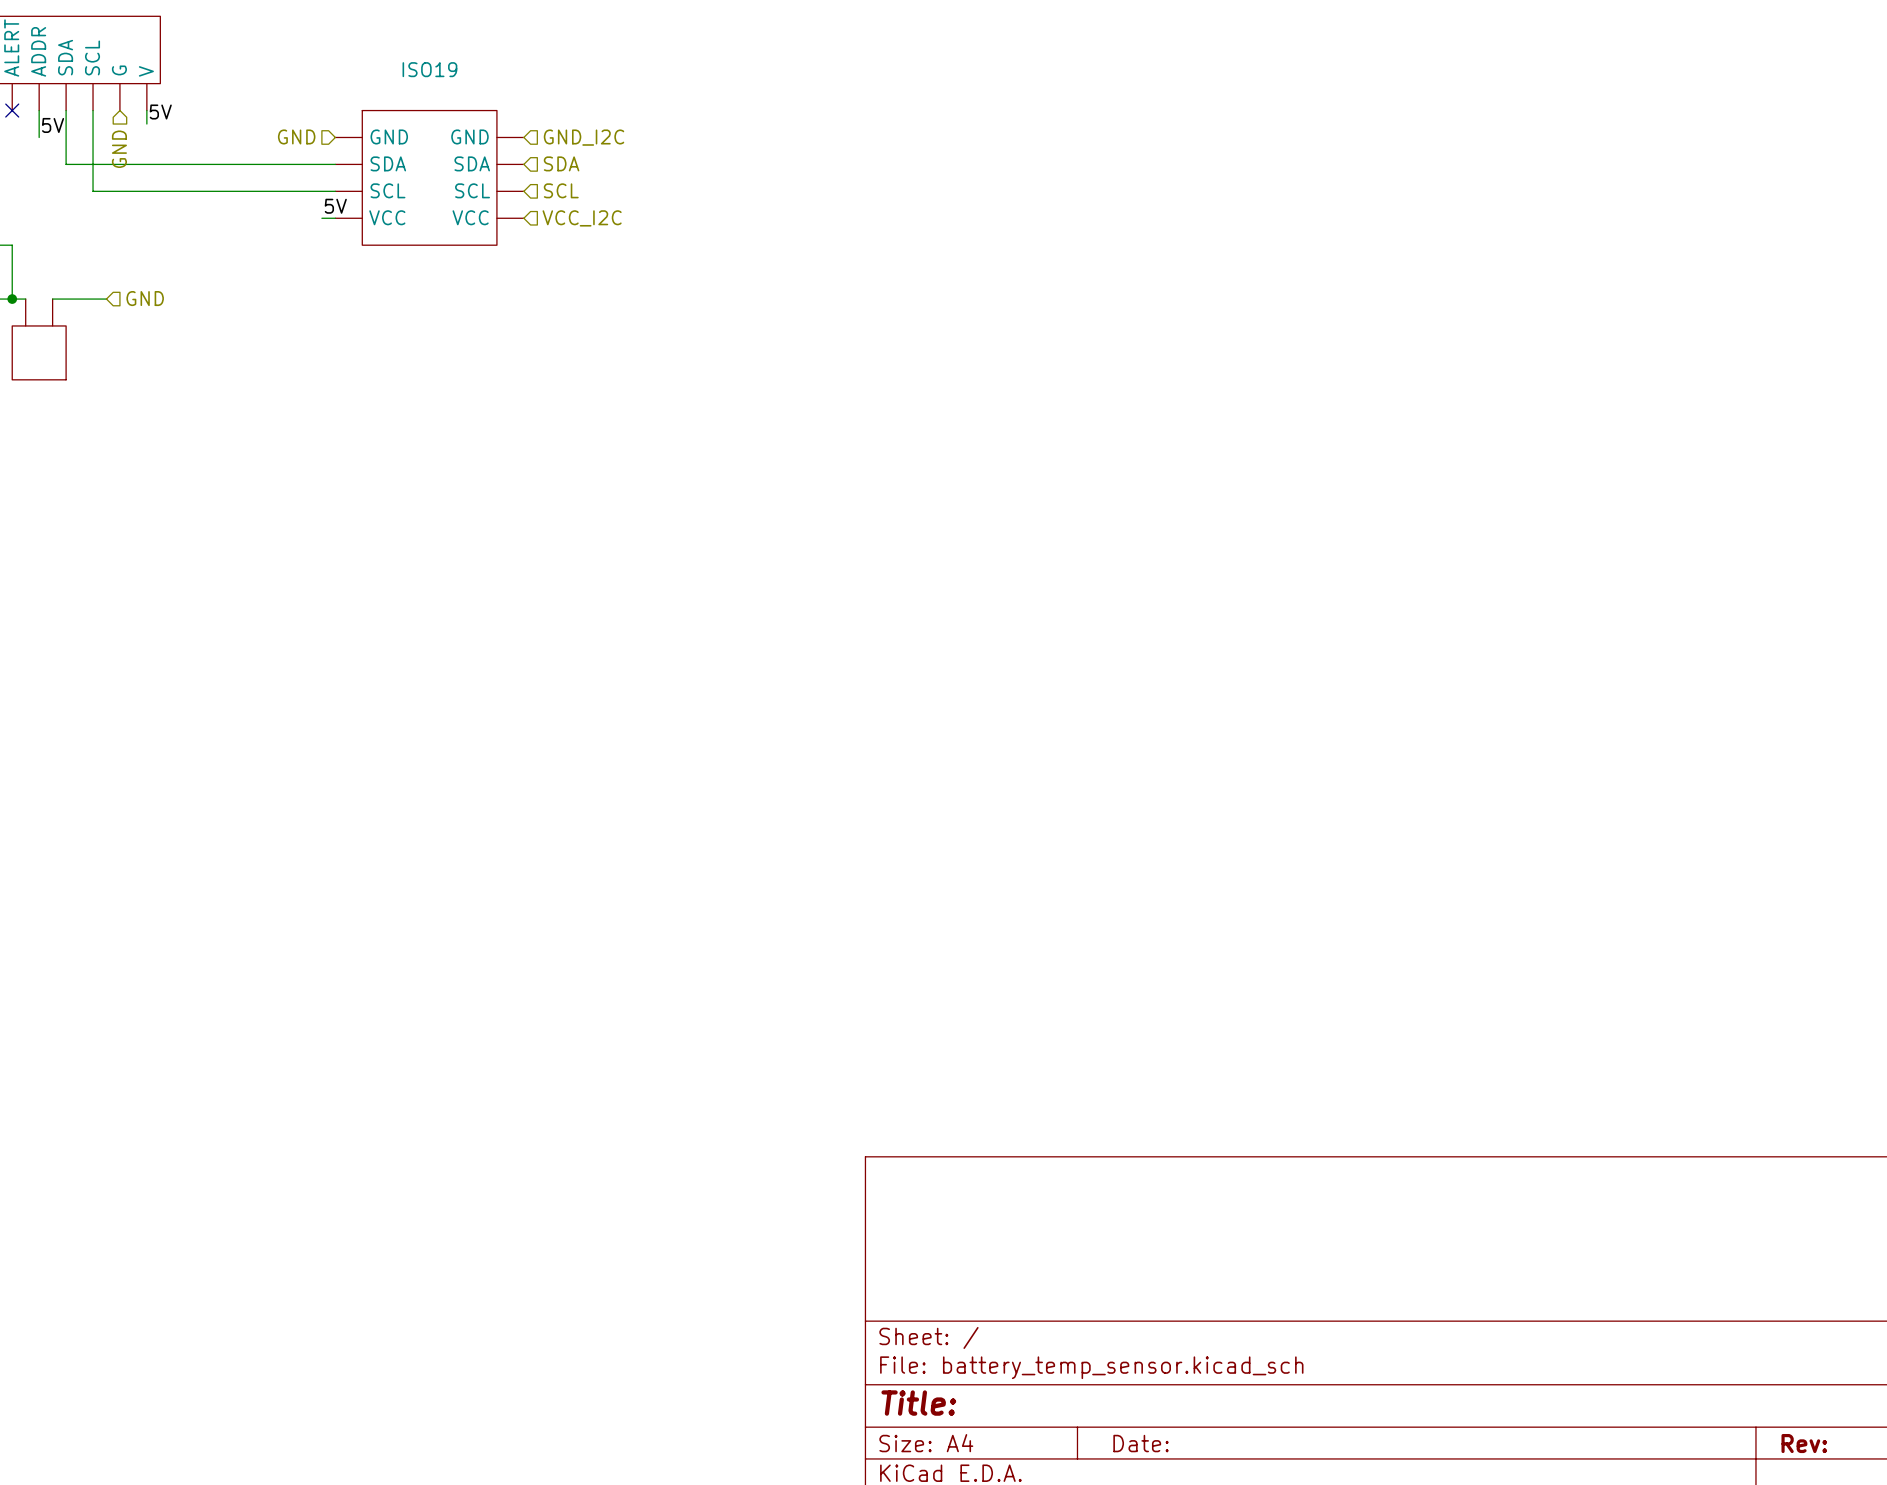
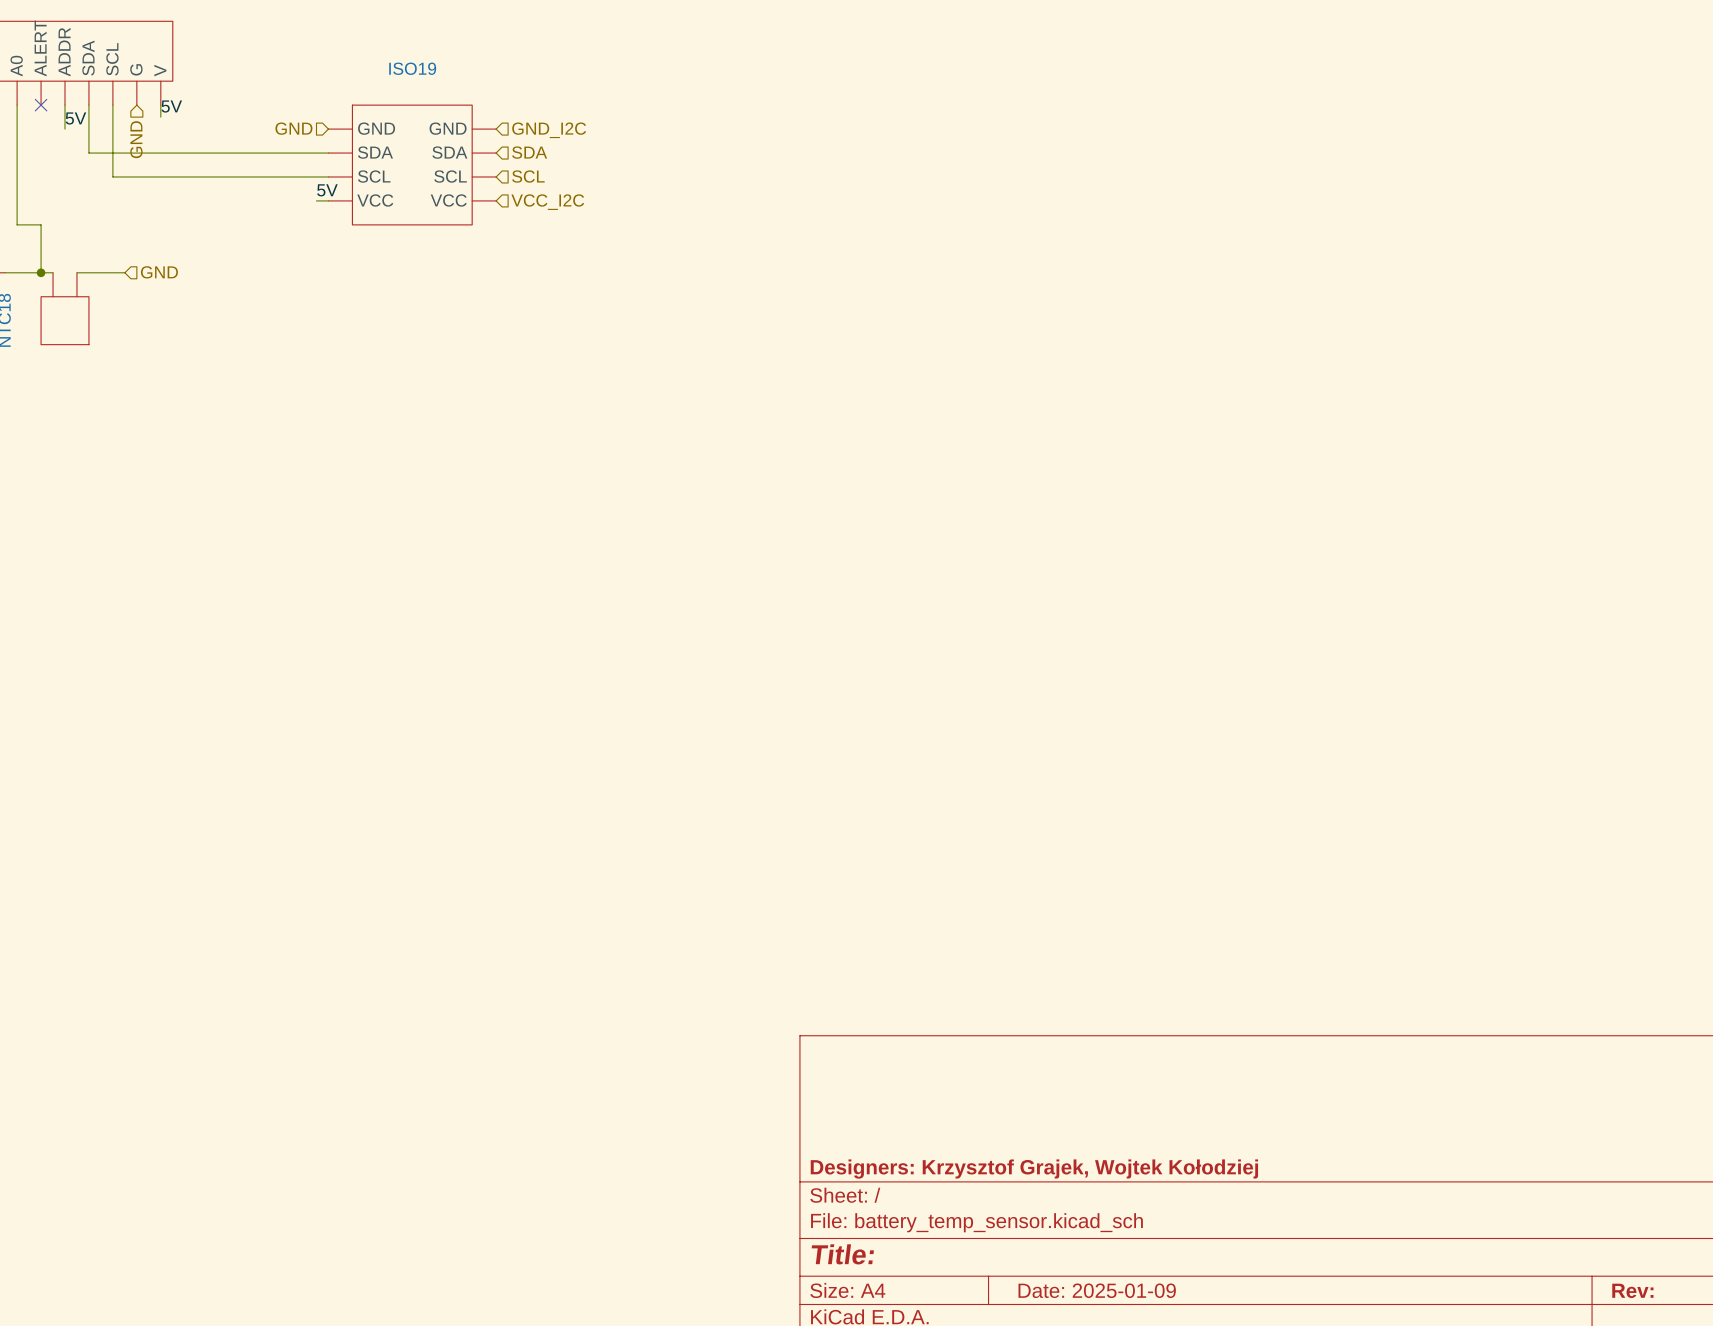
title block: none -> Designers: Krzysztof Grajek, Wojtek Kołodziej (1034, 1169)
title block: Date: (1141, 1443) -> Date: 2025-01-09 (1097, 1290)

